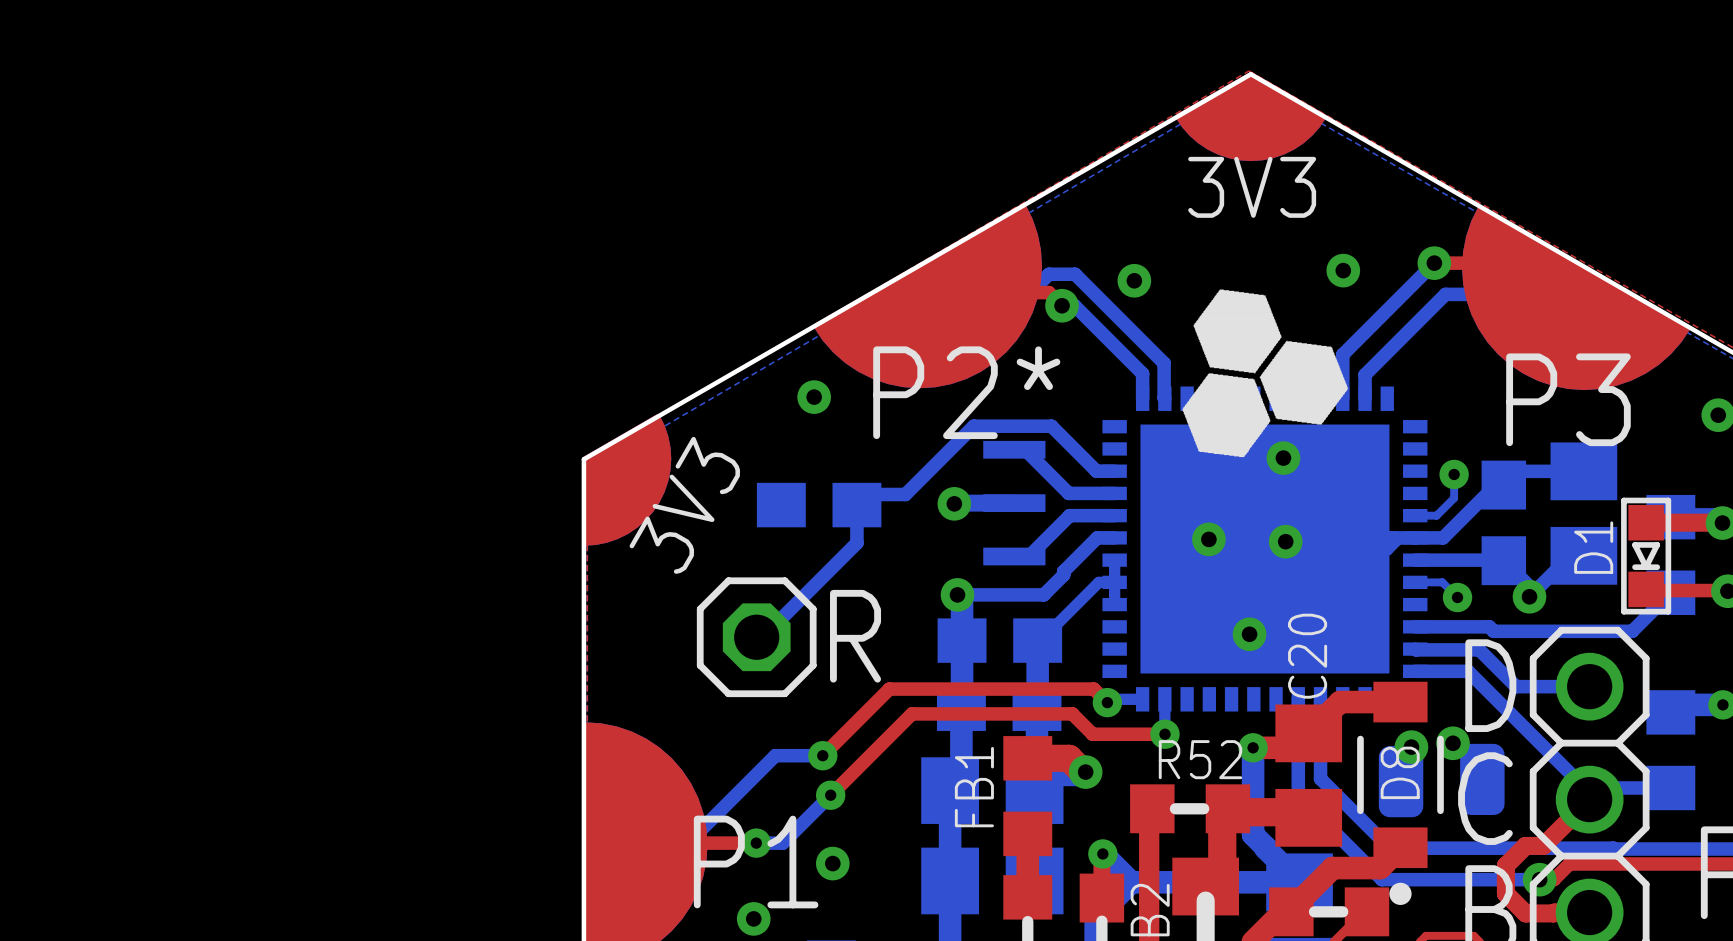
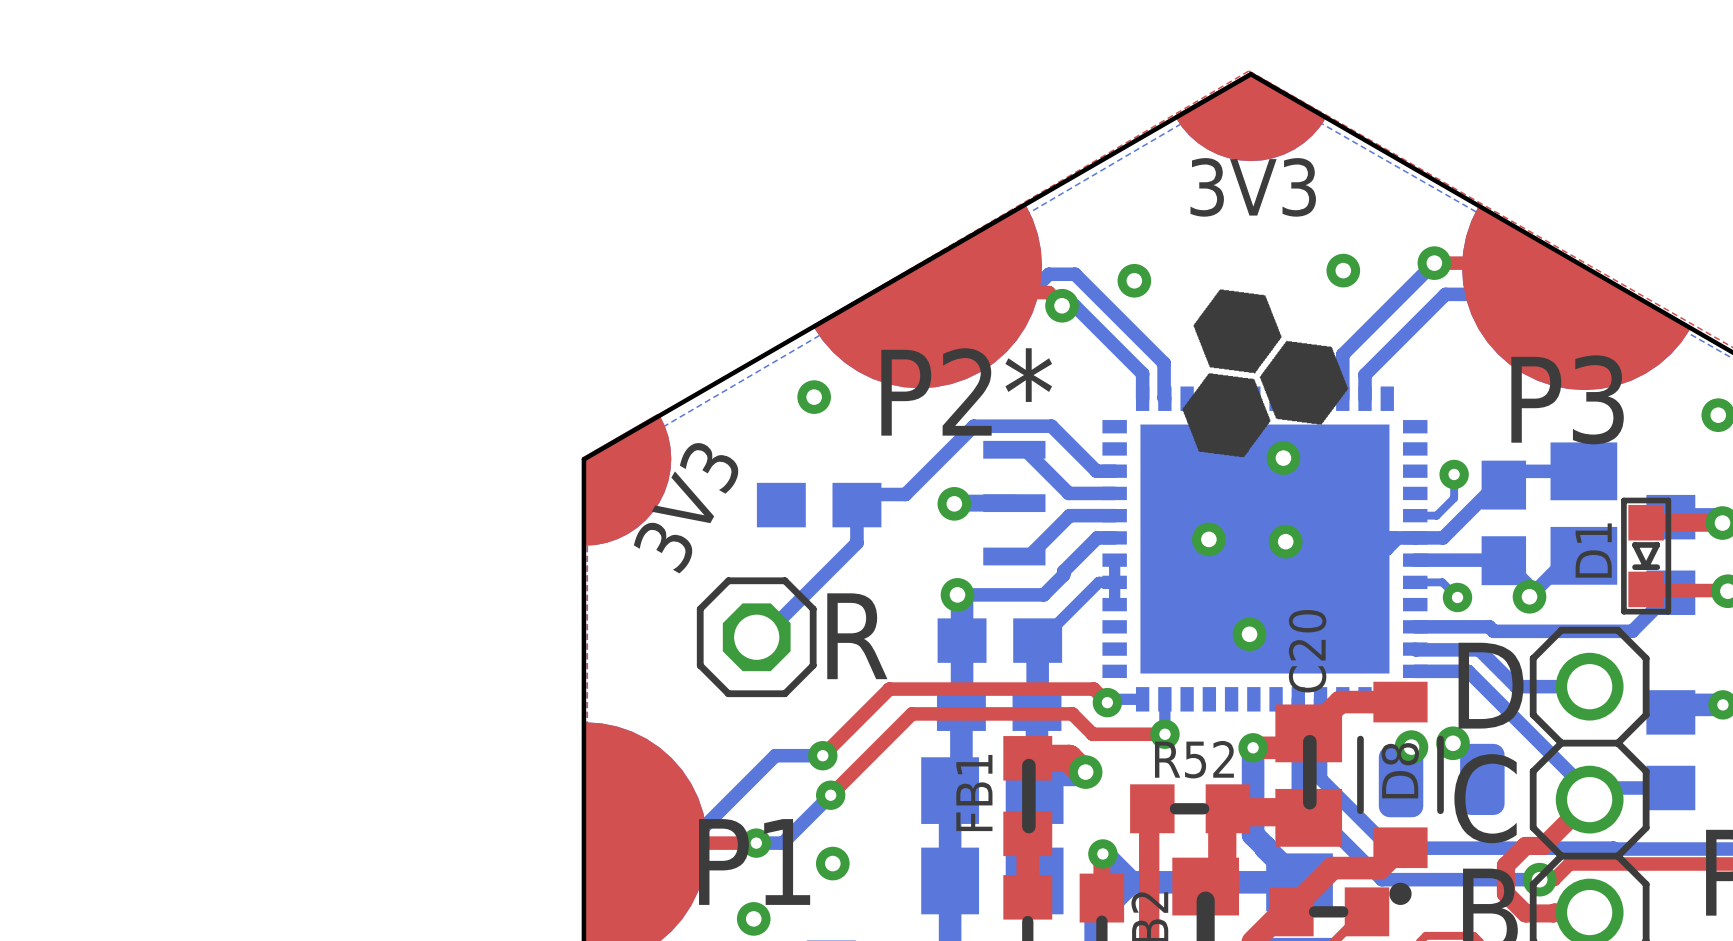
C20 footprint: [1275, 704, 1343, 847] -> [1275, 704, 1343, 847]
FB1 footprint: [1003, 736, 1053, 857] -> [1003, 736, 1053, 857]

